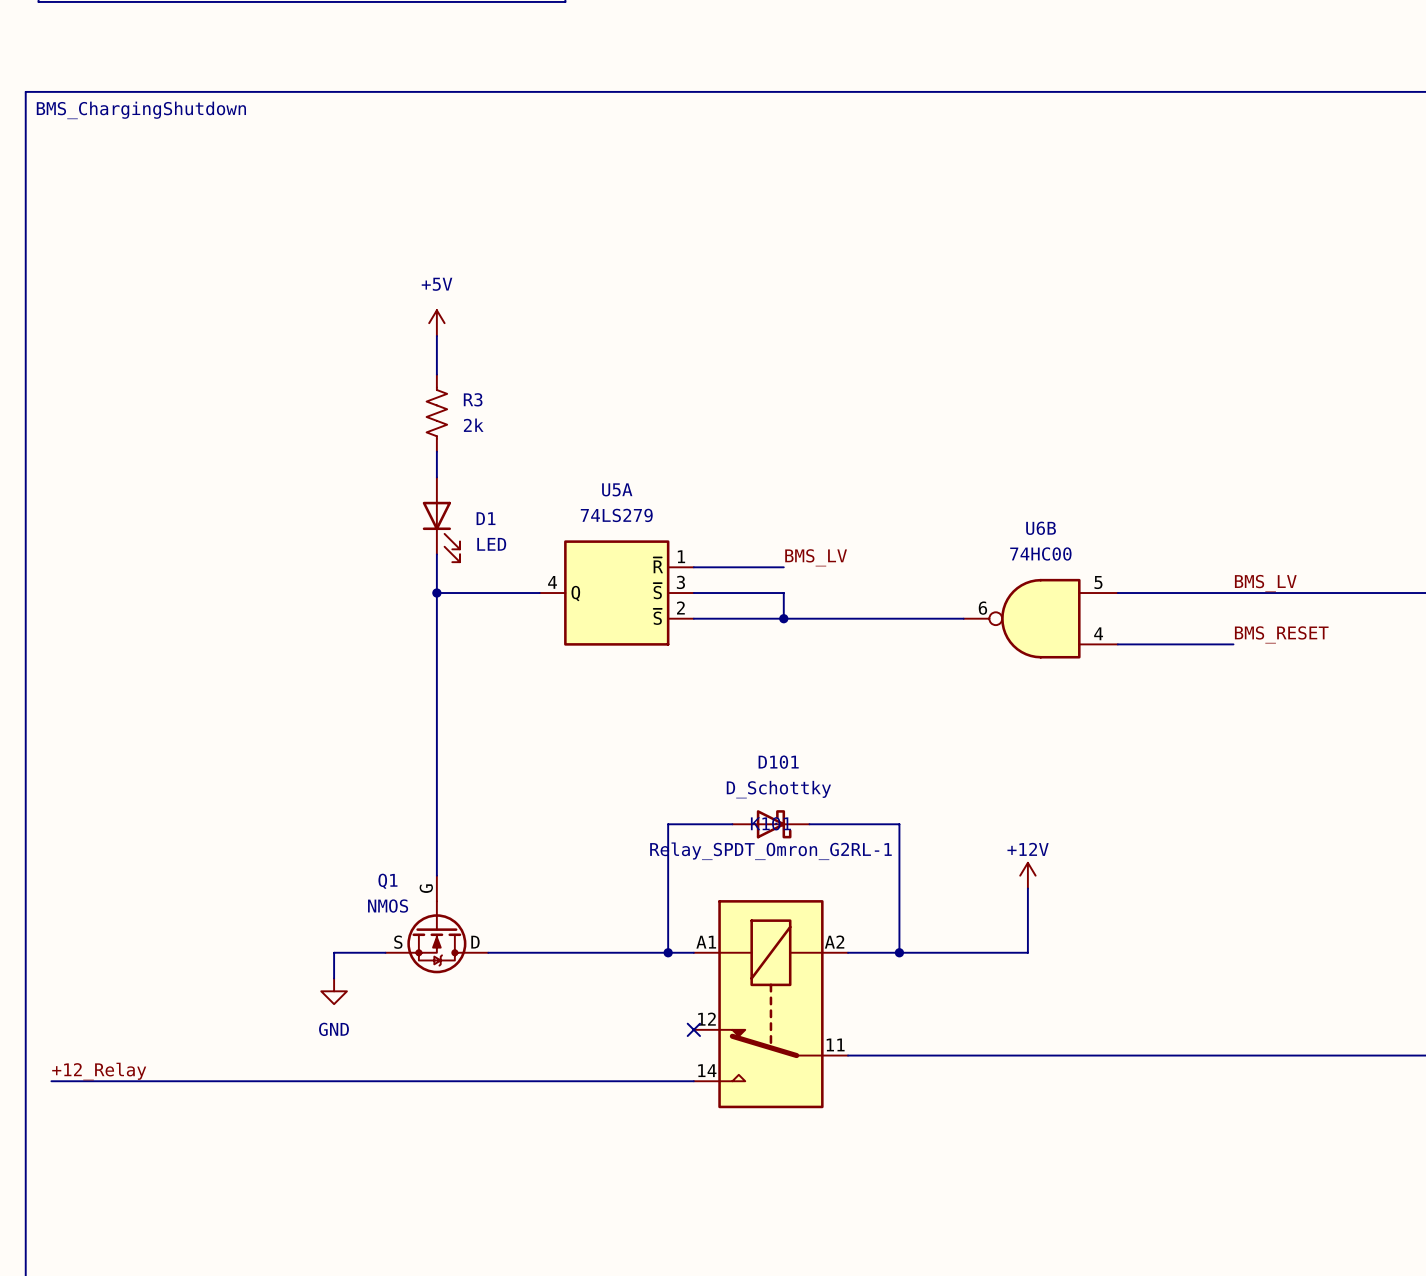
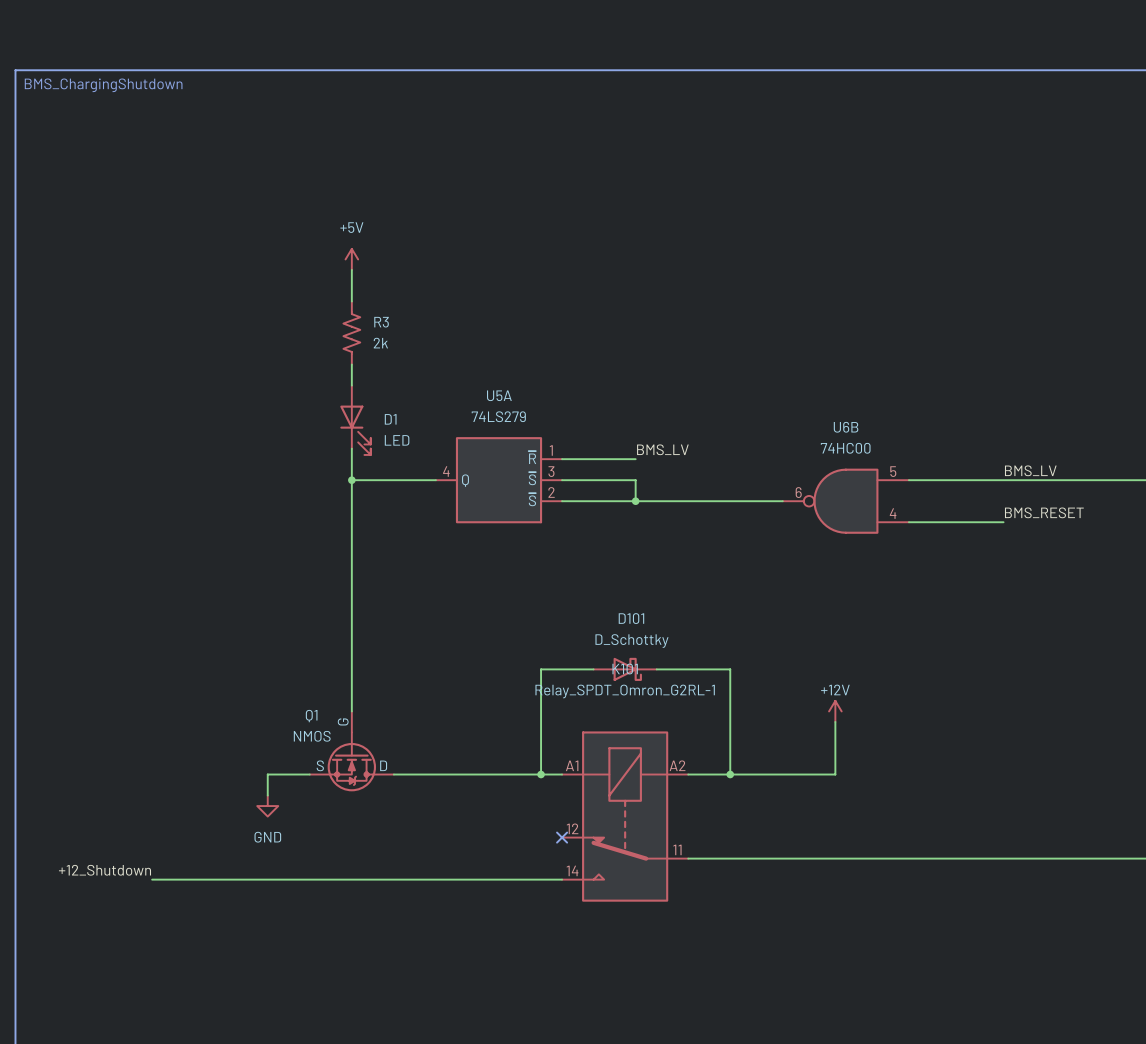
label: +12_Relay (99, 1071) -> none
label: none -> +12_Shutdown (104, 870)
wire: (51, 1081) (192, 1081) -> none

